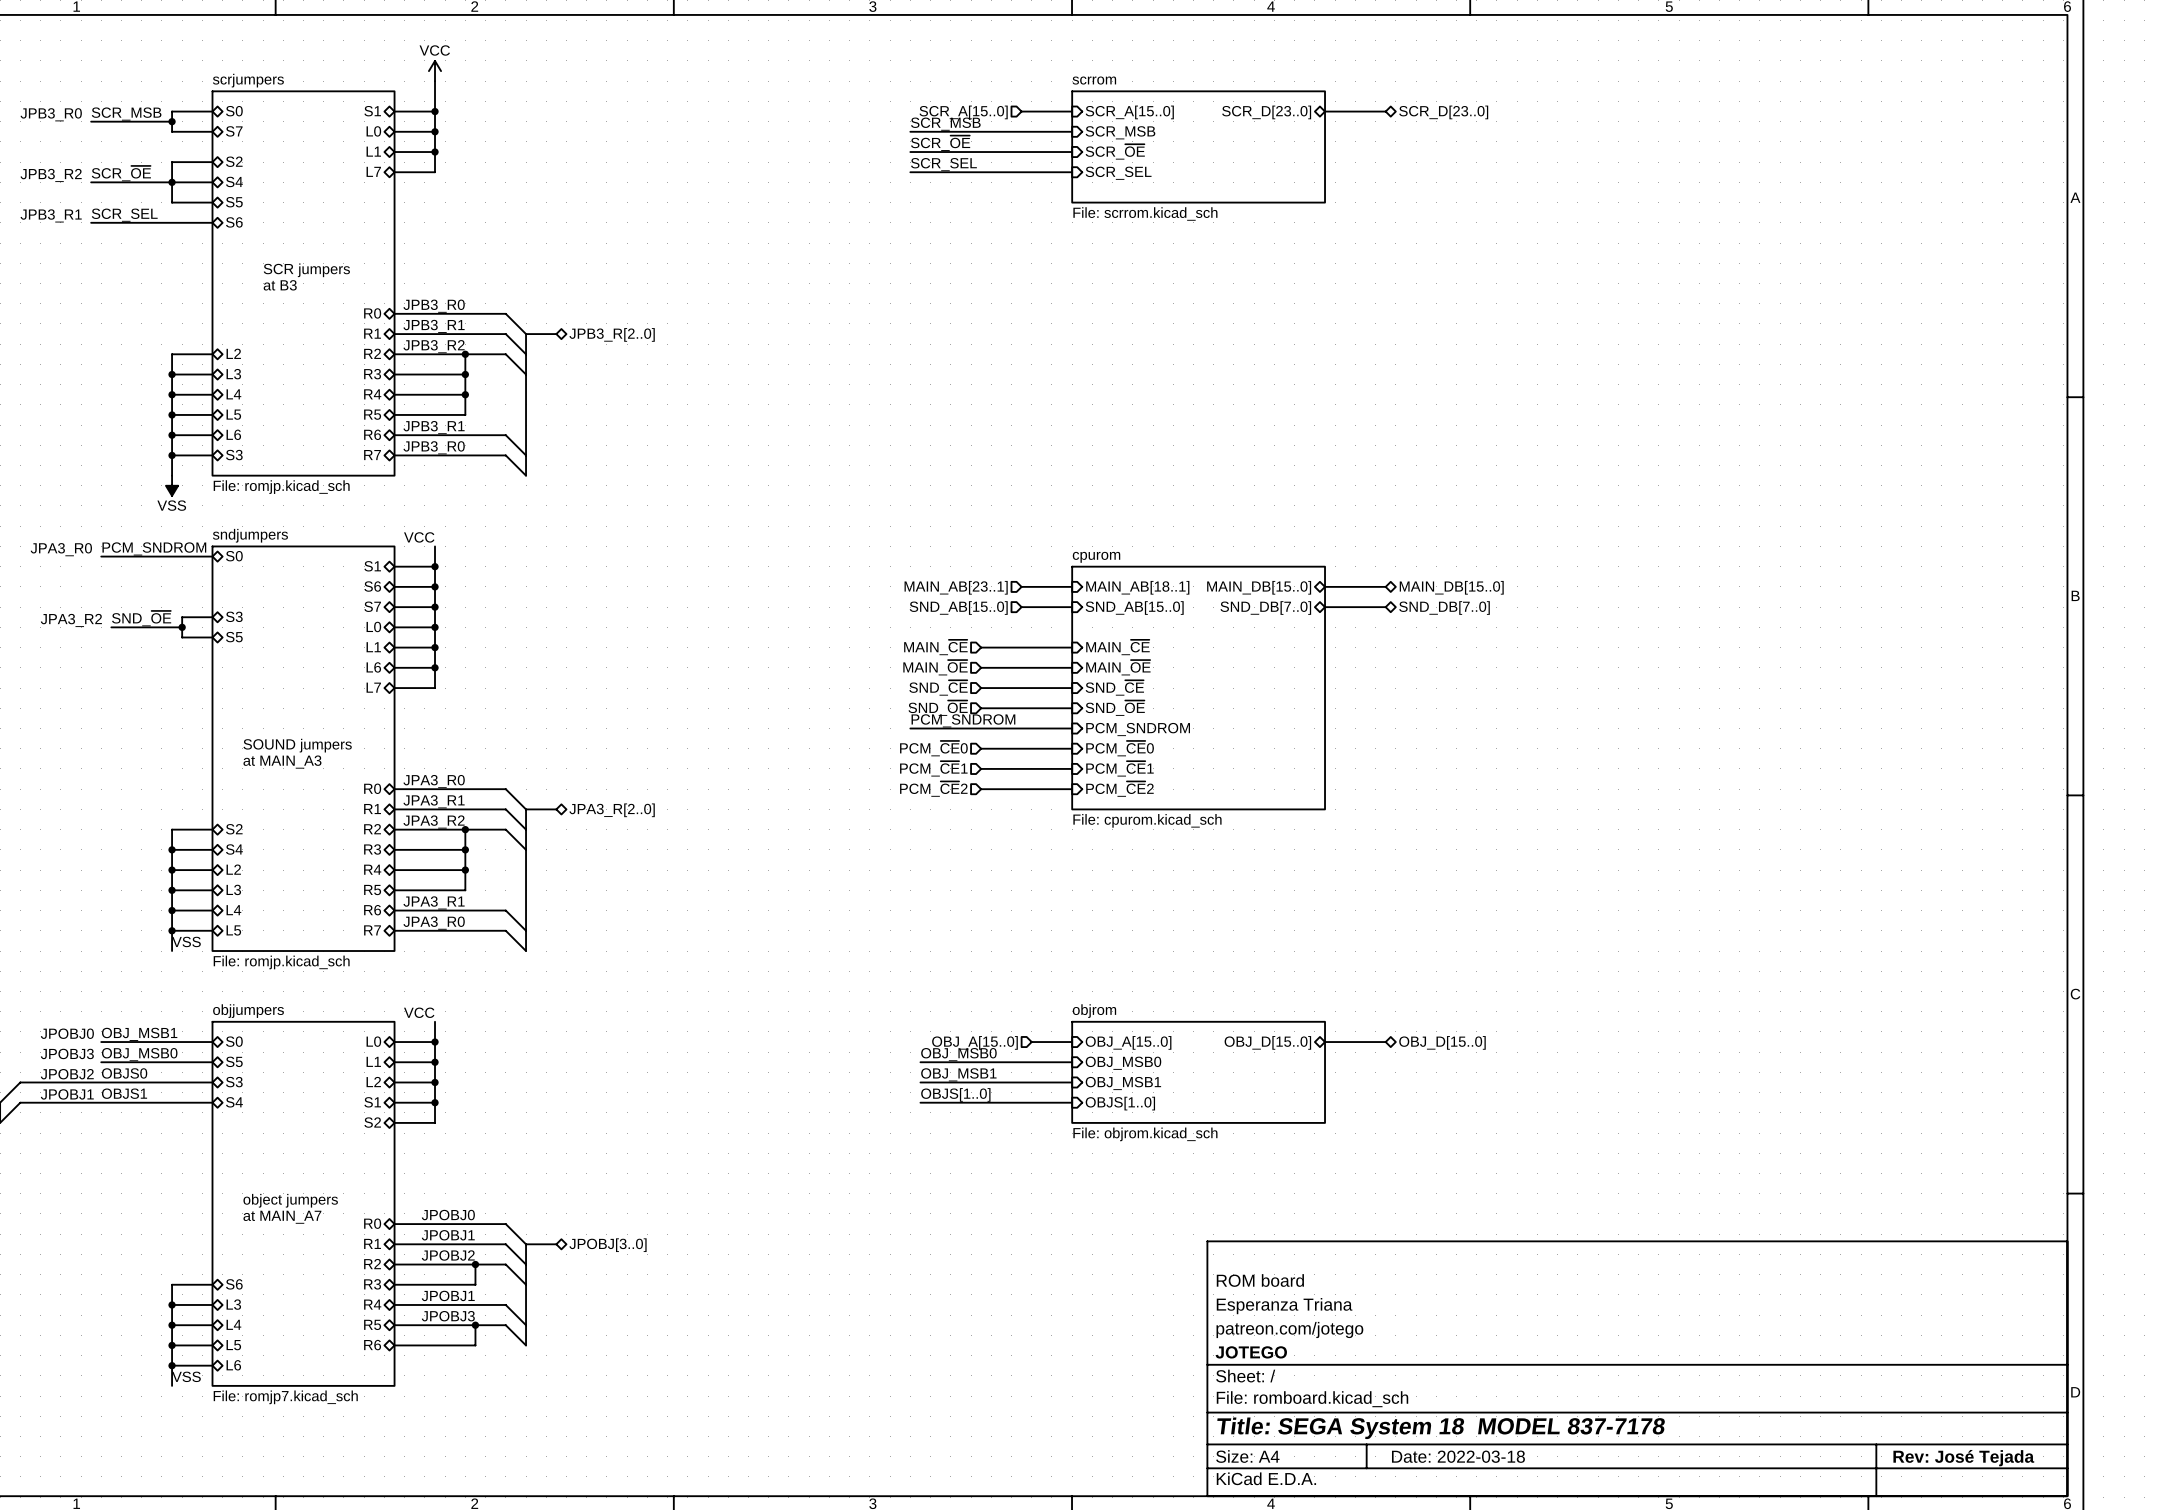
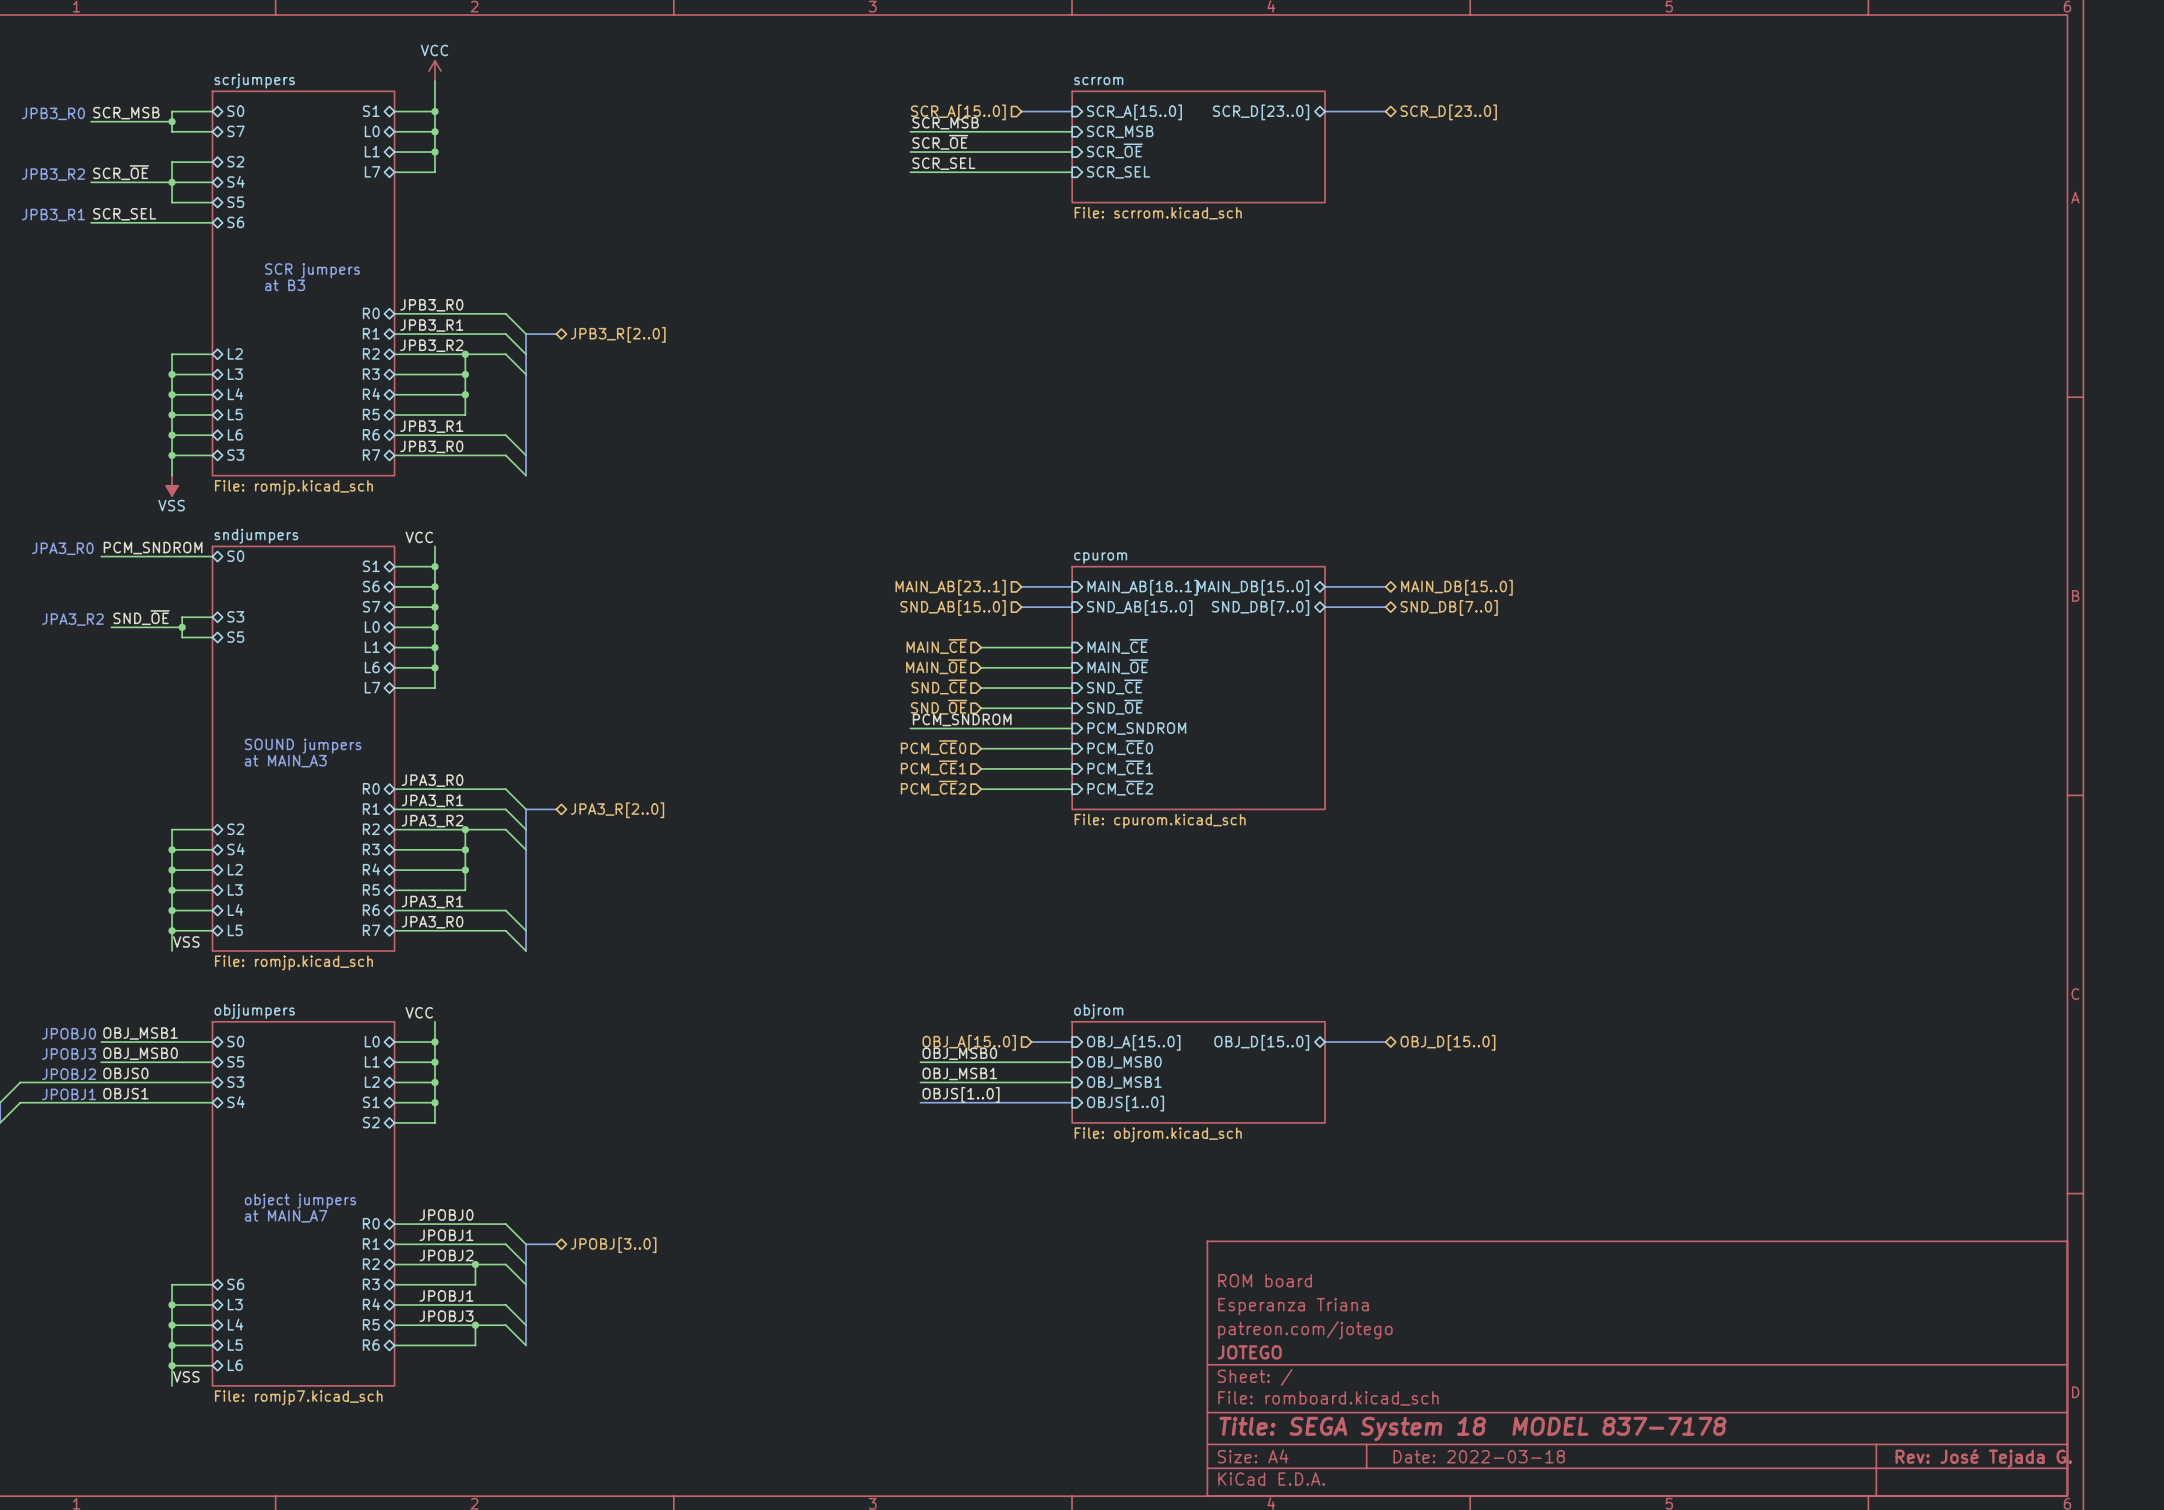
title block: Rev: José Tejada (1963, 1458) -> Rev: José Tejada G. (1983, 1458)

